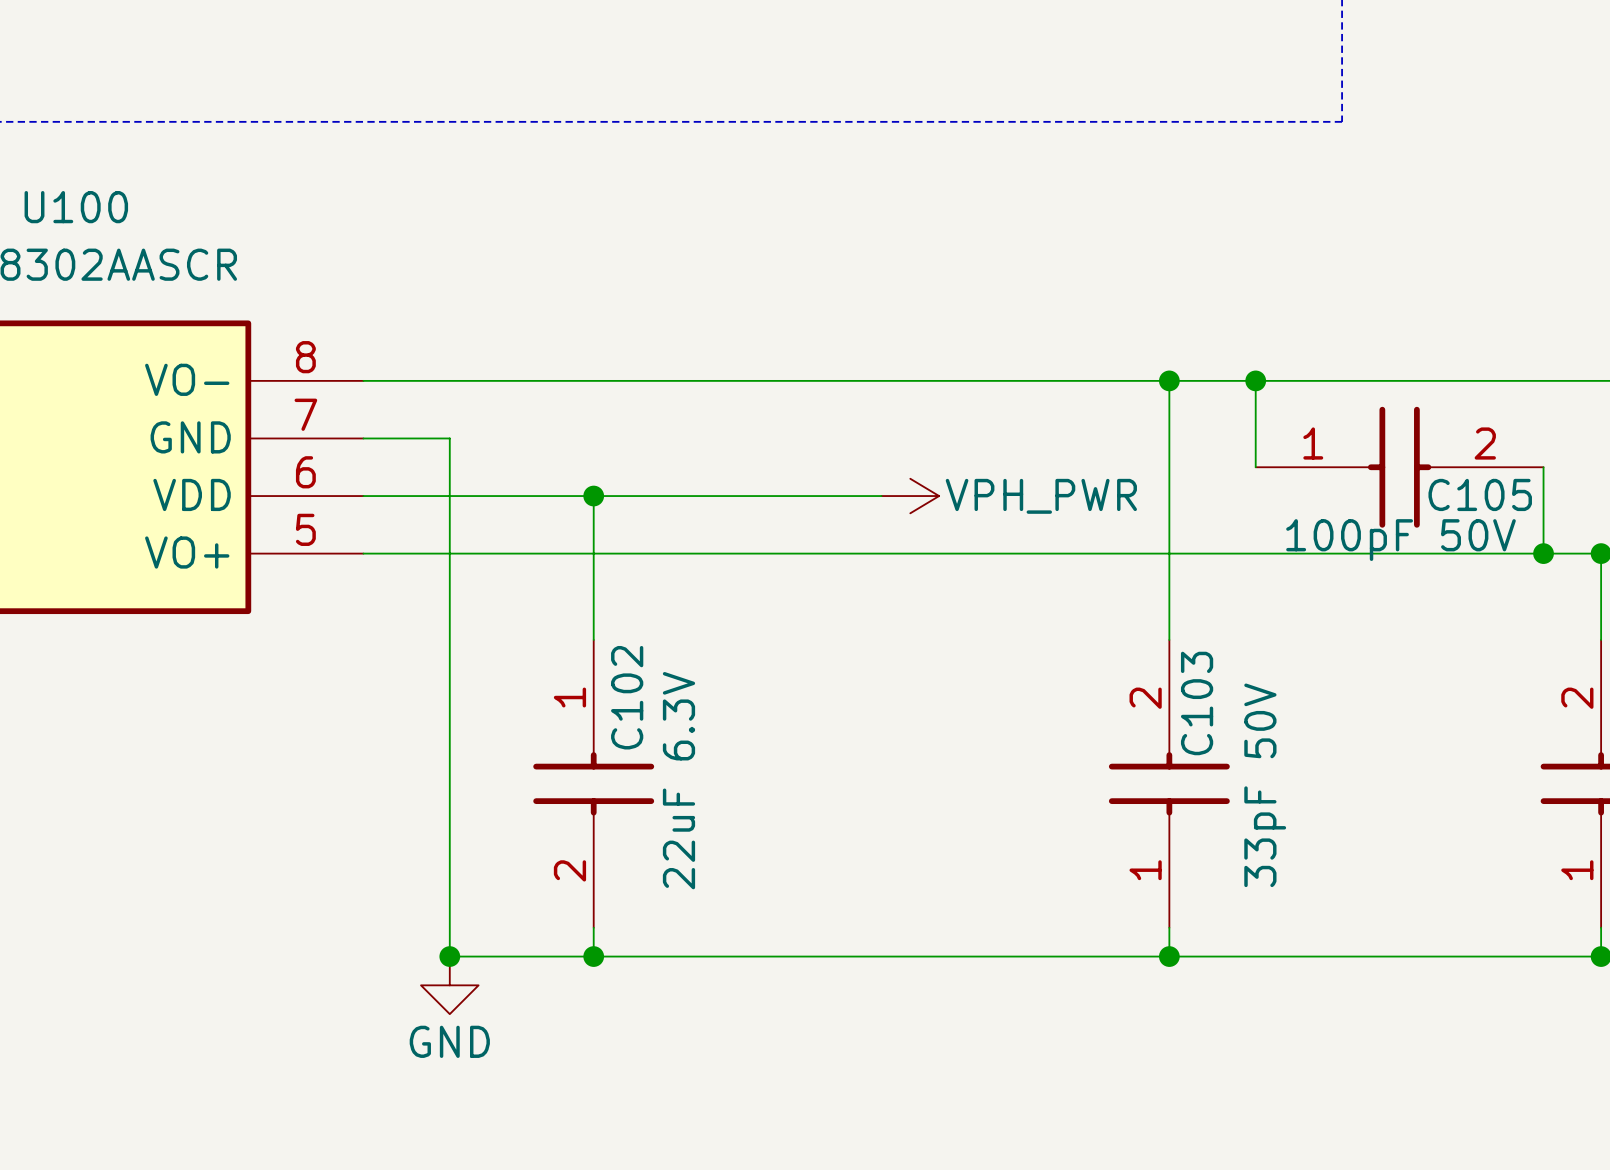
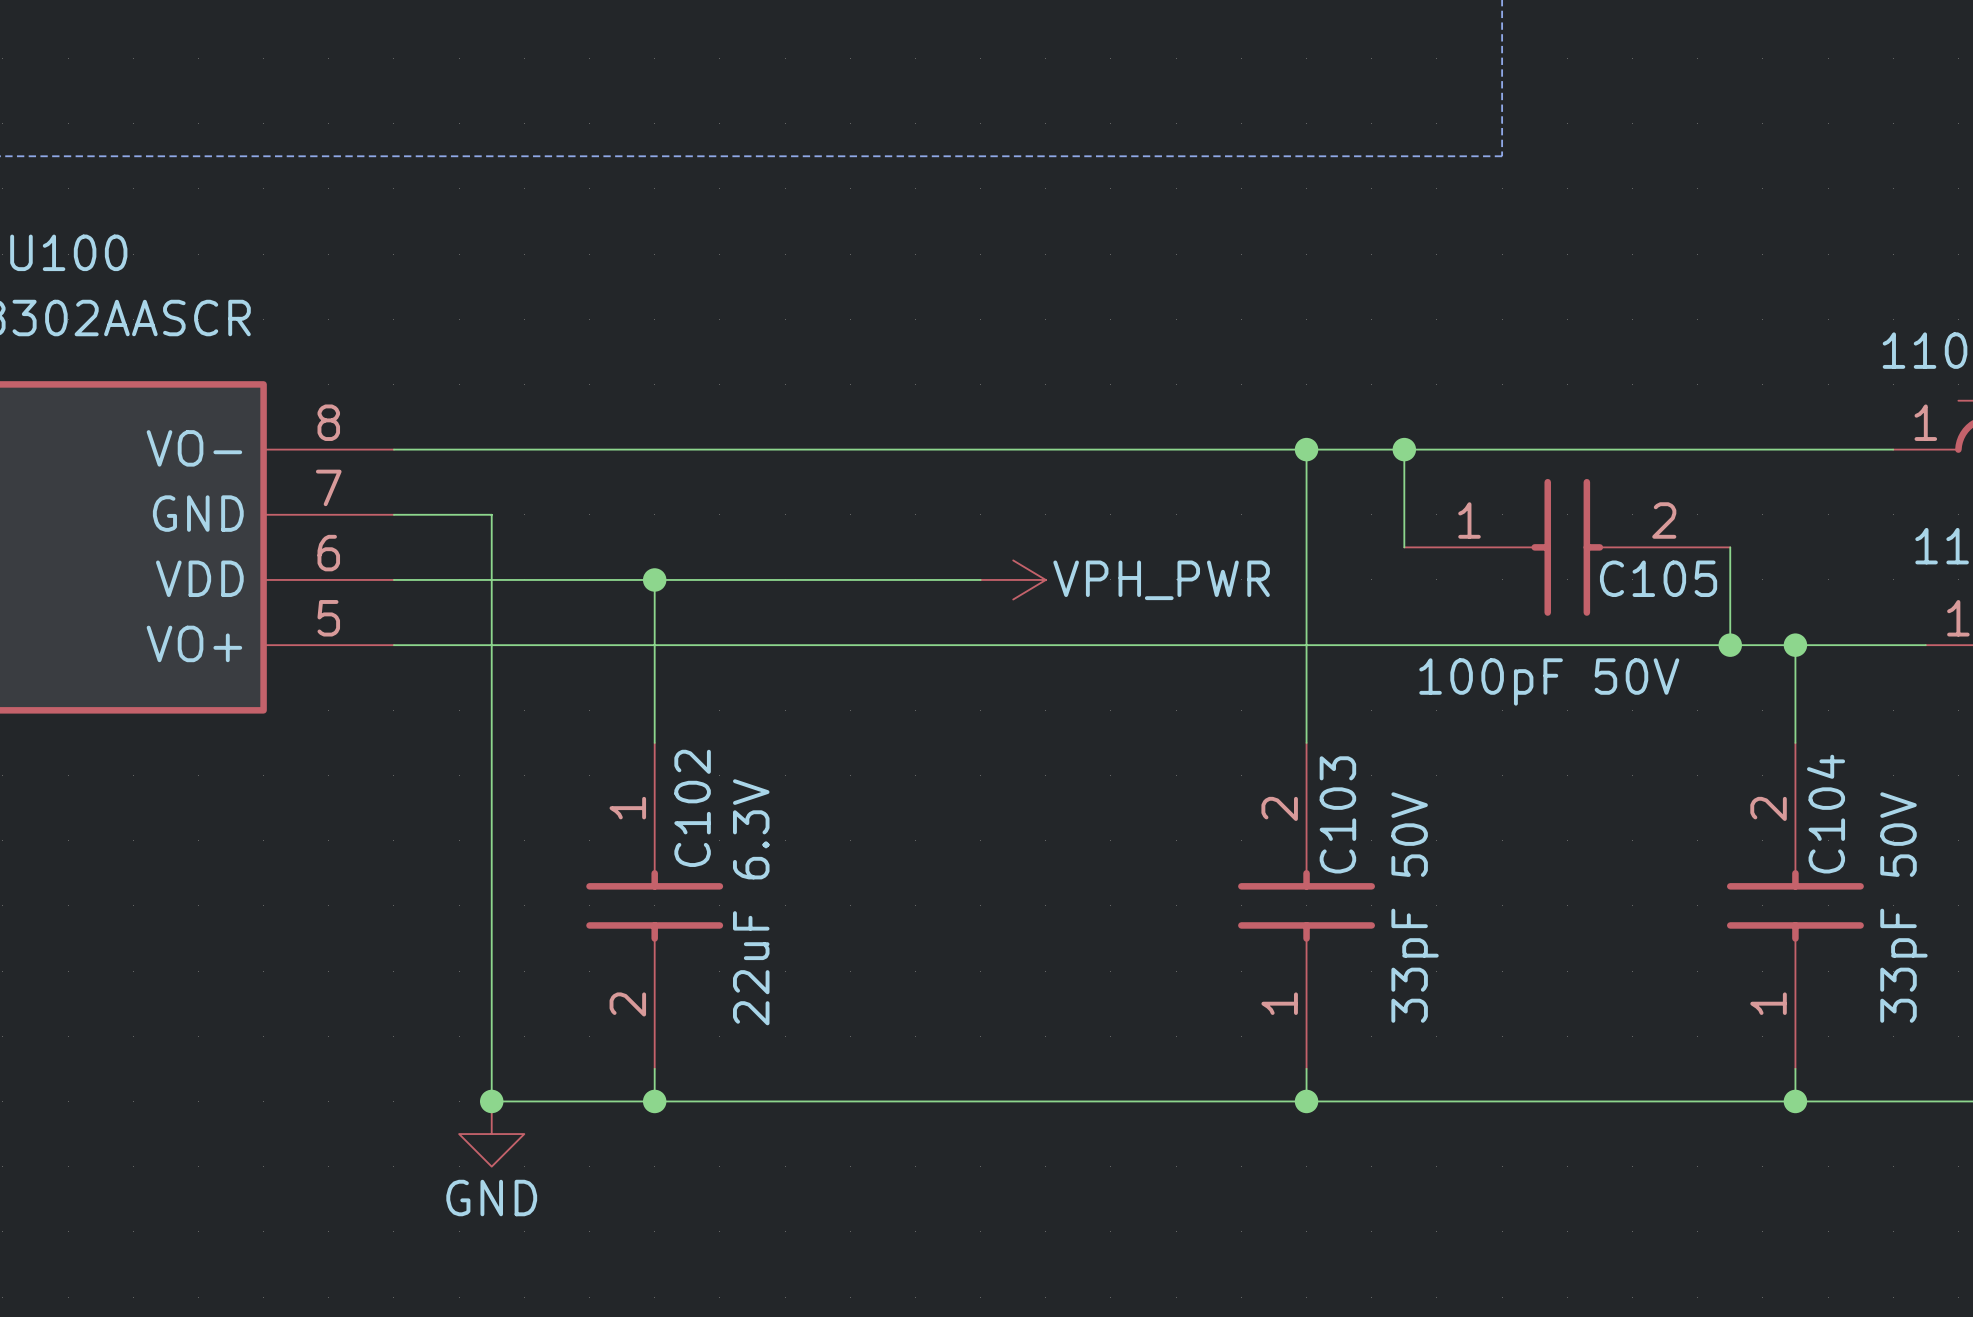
C105 value position: 100pF 50V (1400, 540) -> 100pF 50V (1549, 681)

